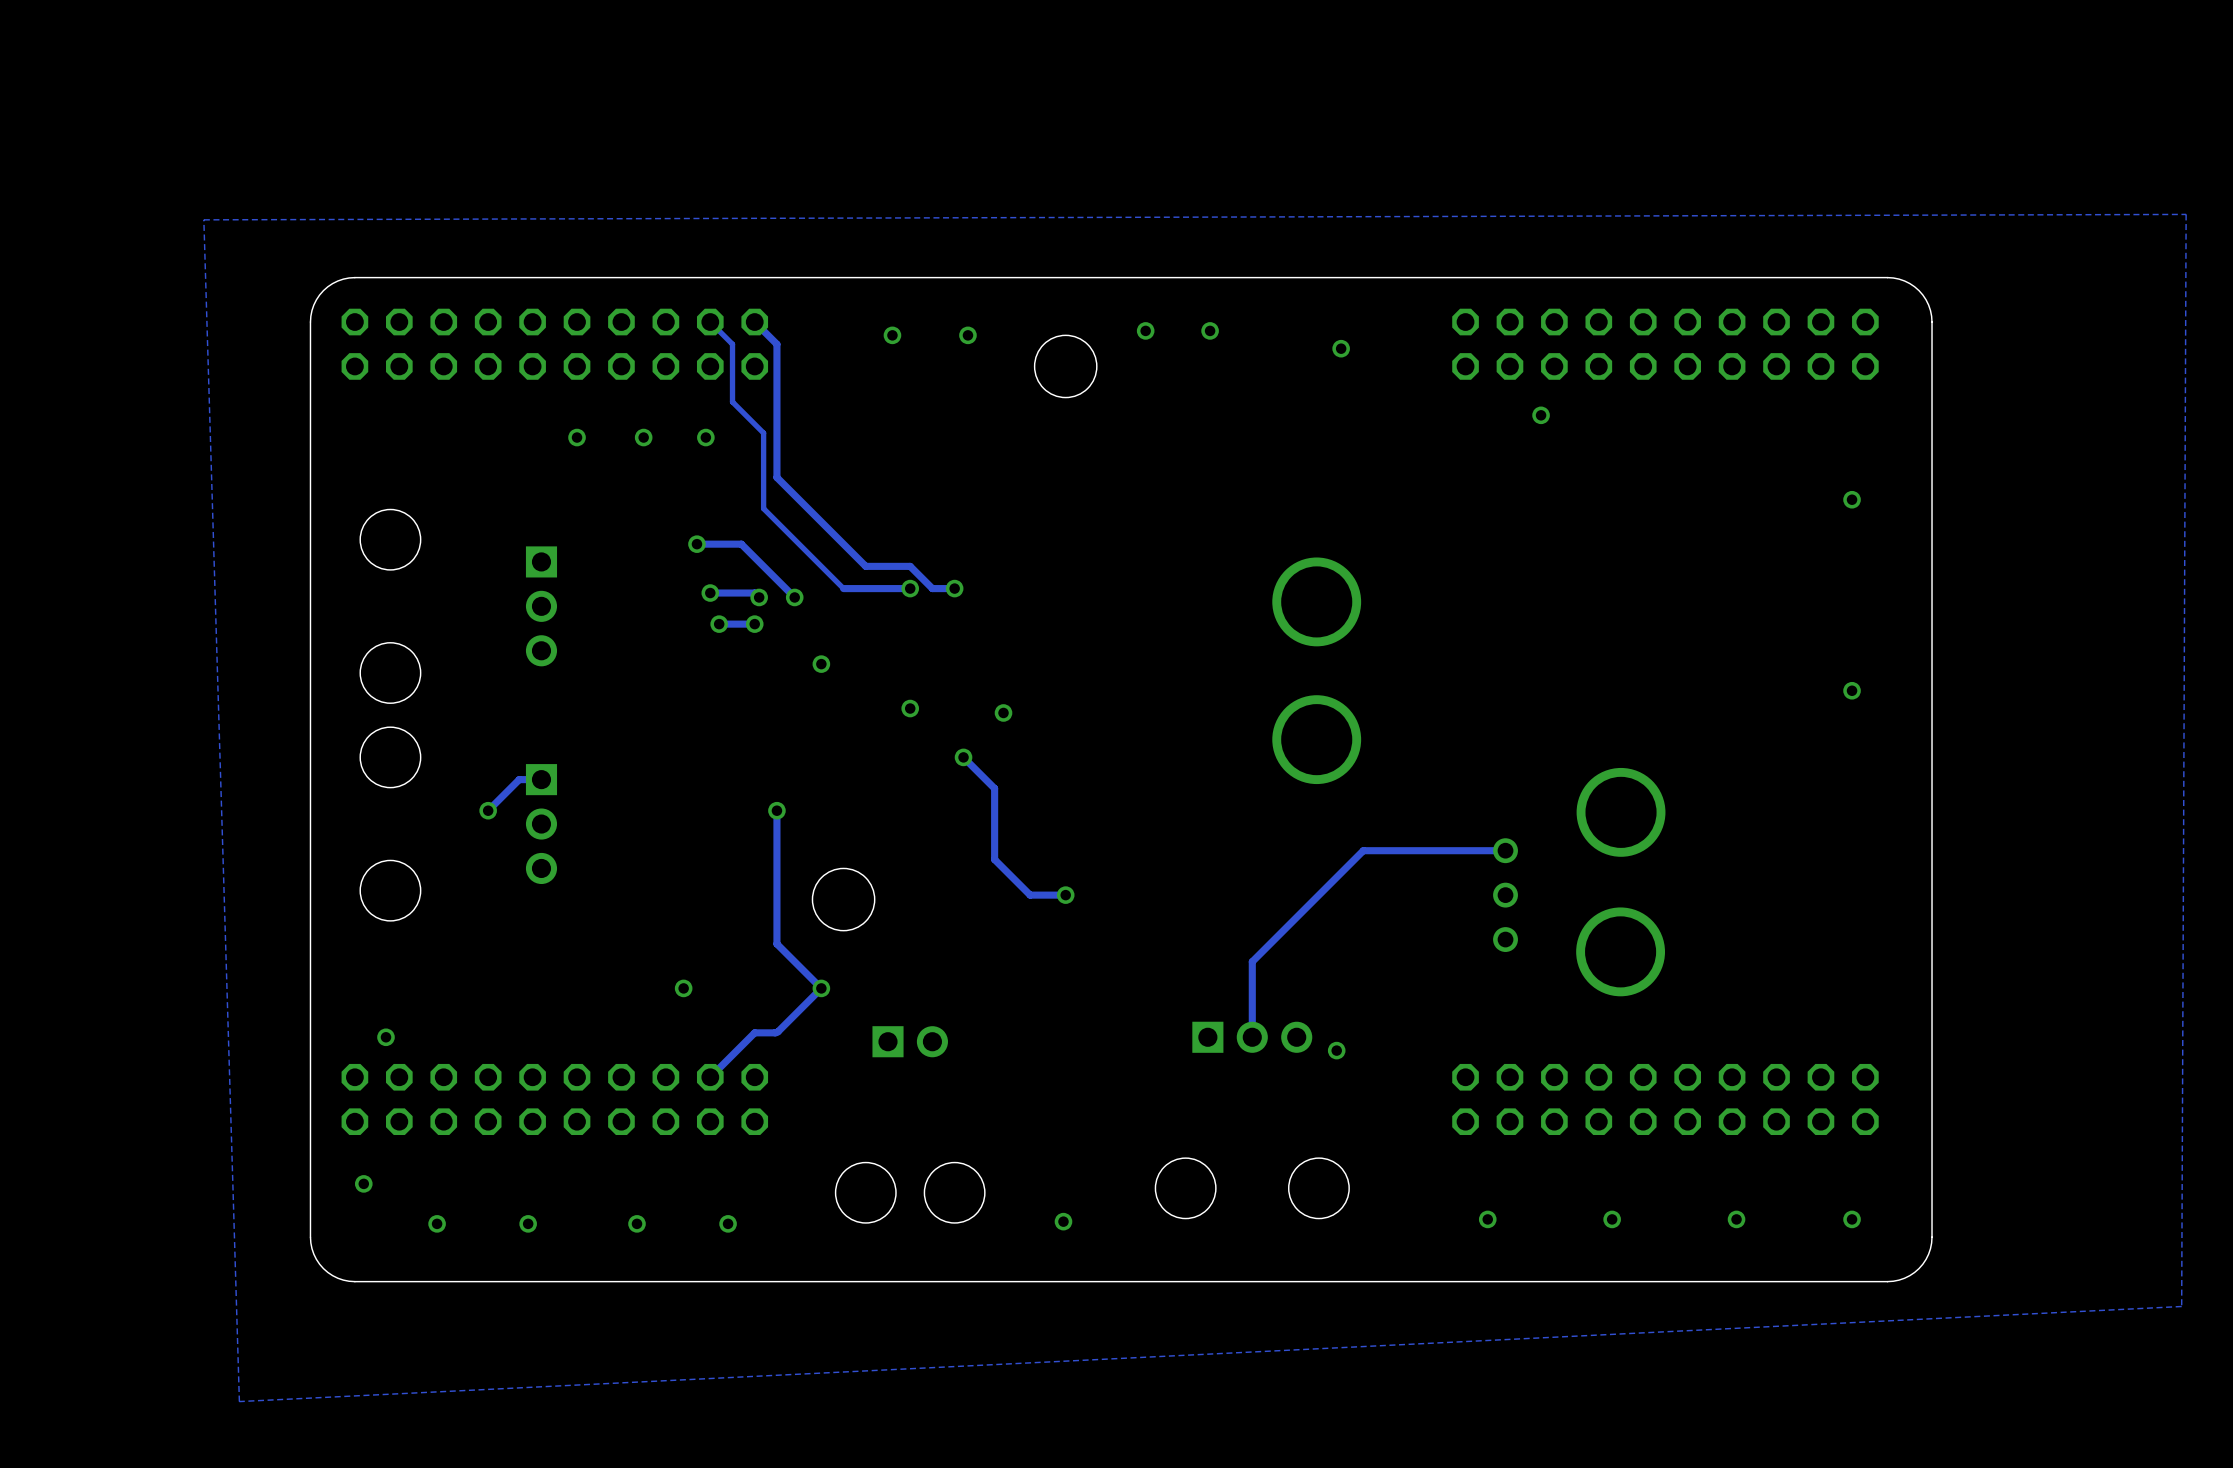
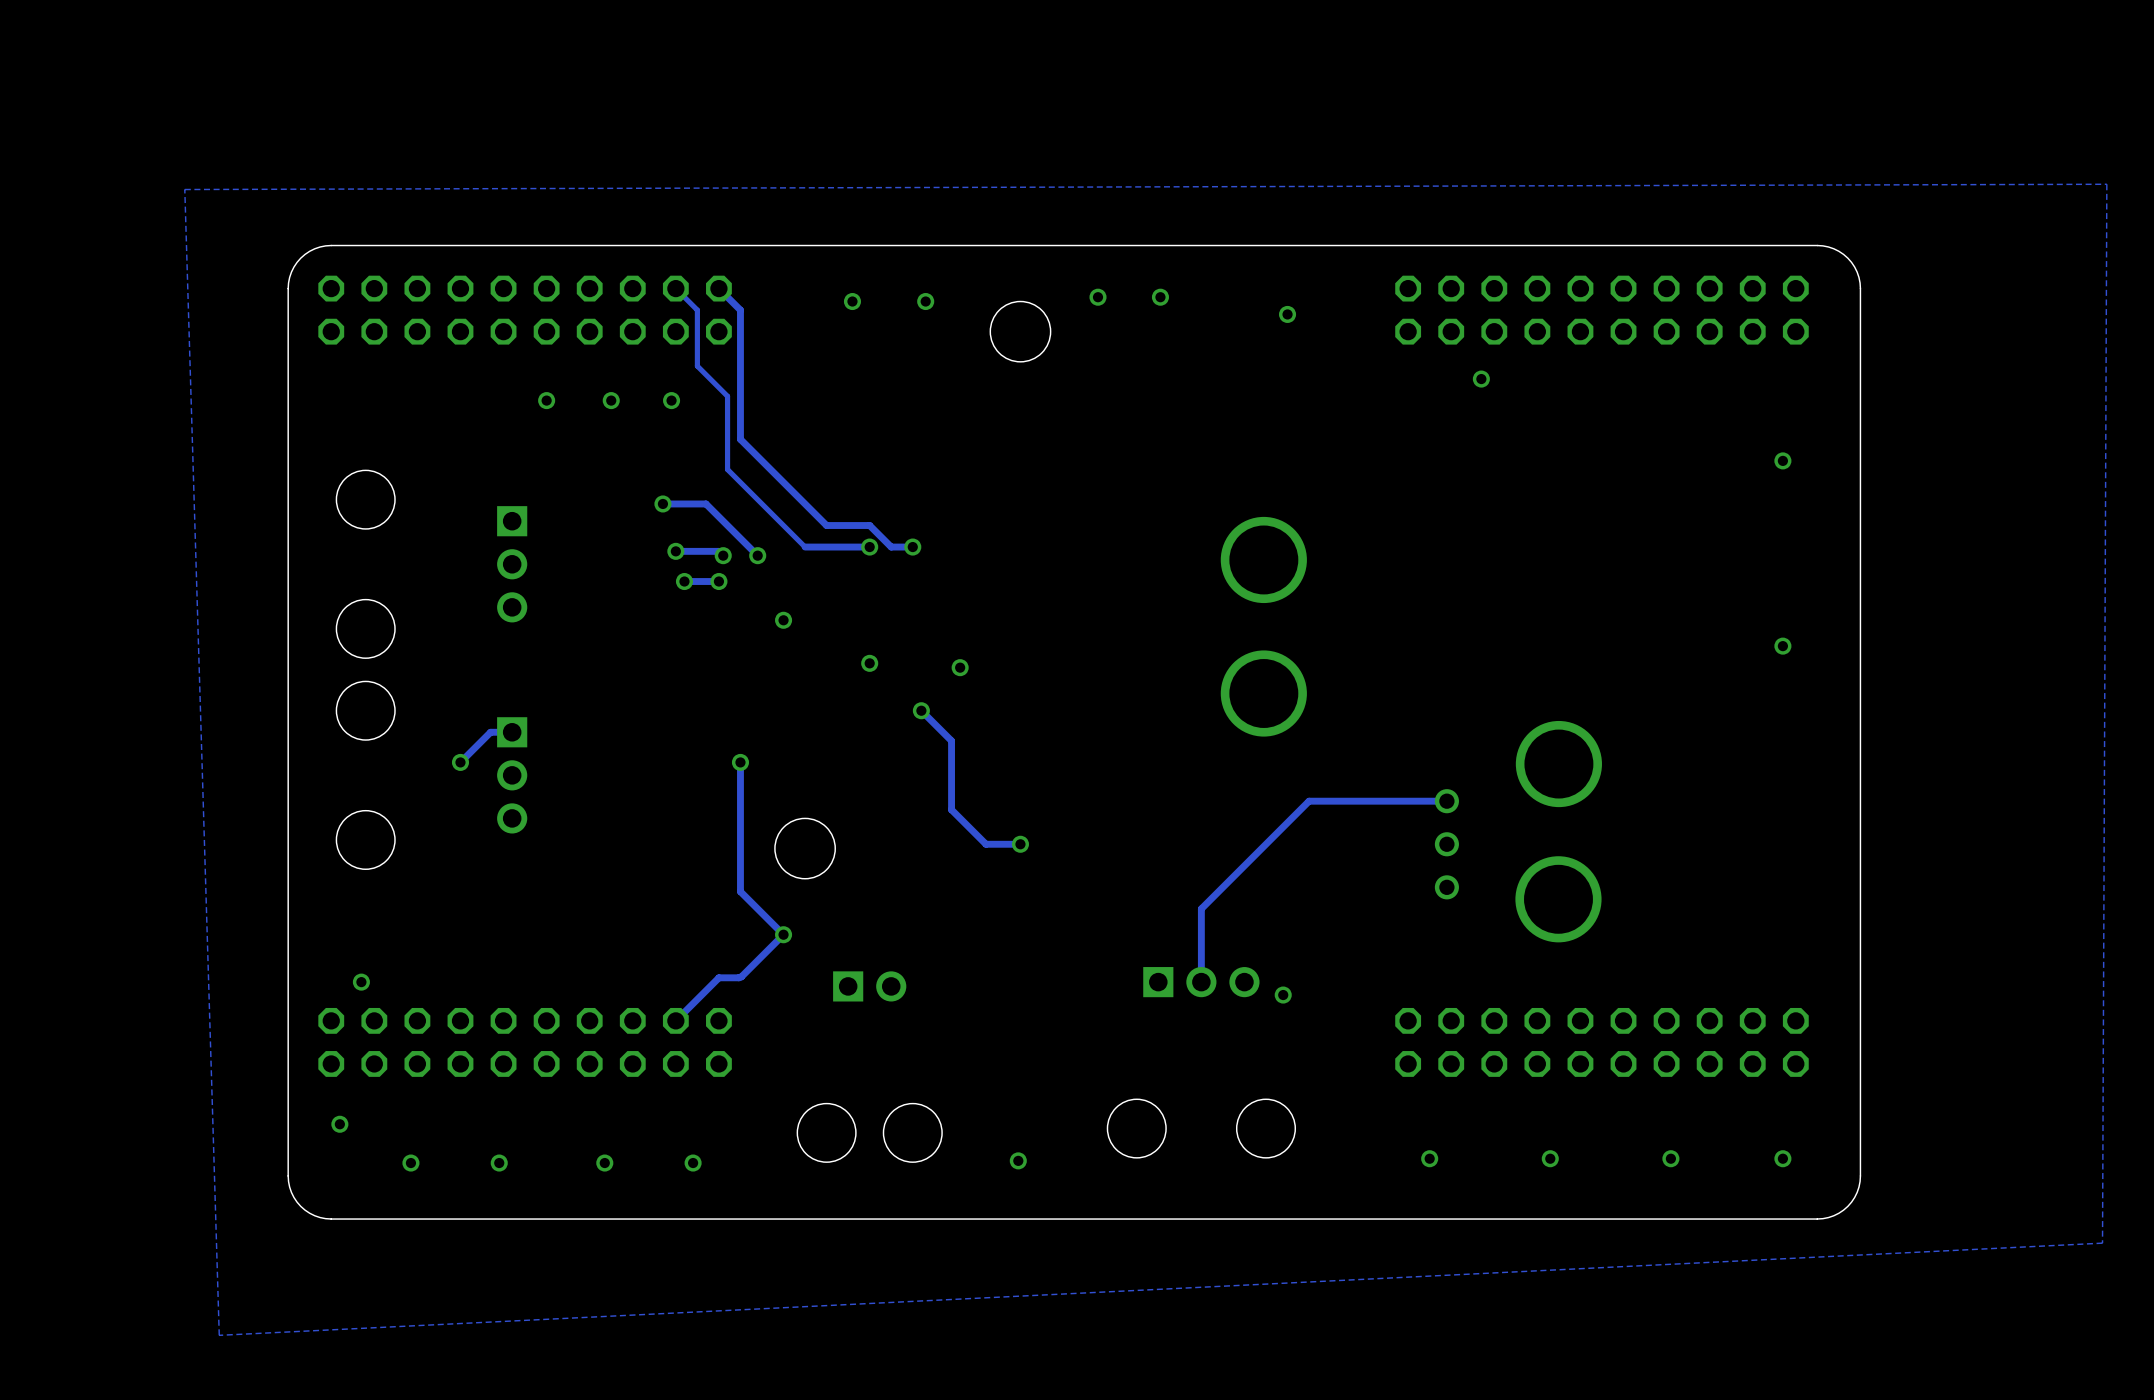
via: (683, 988) -> none

